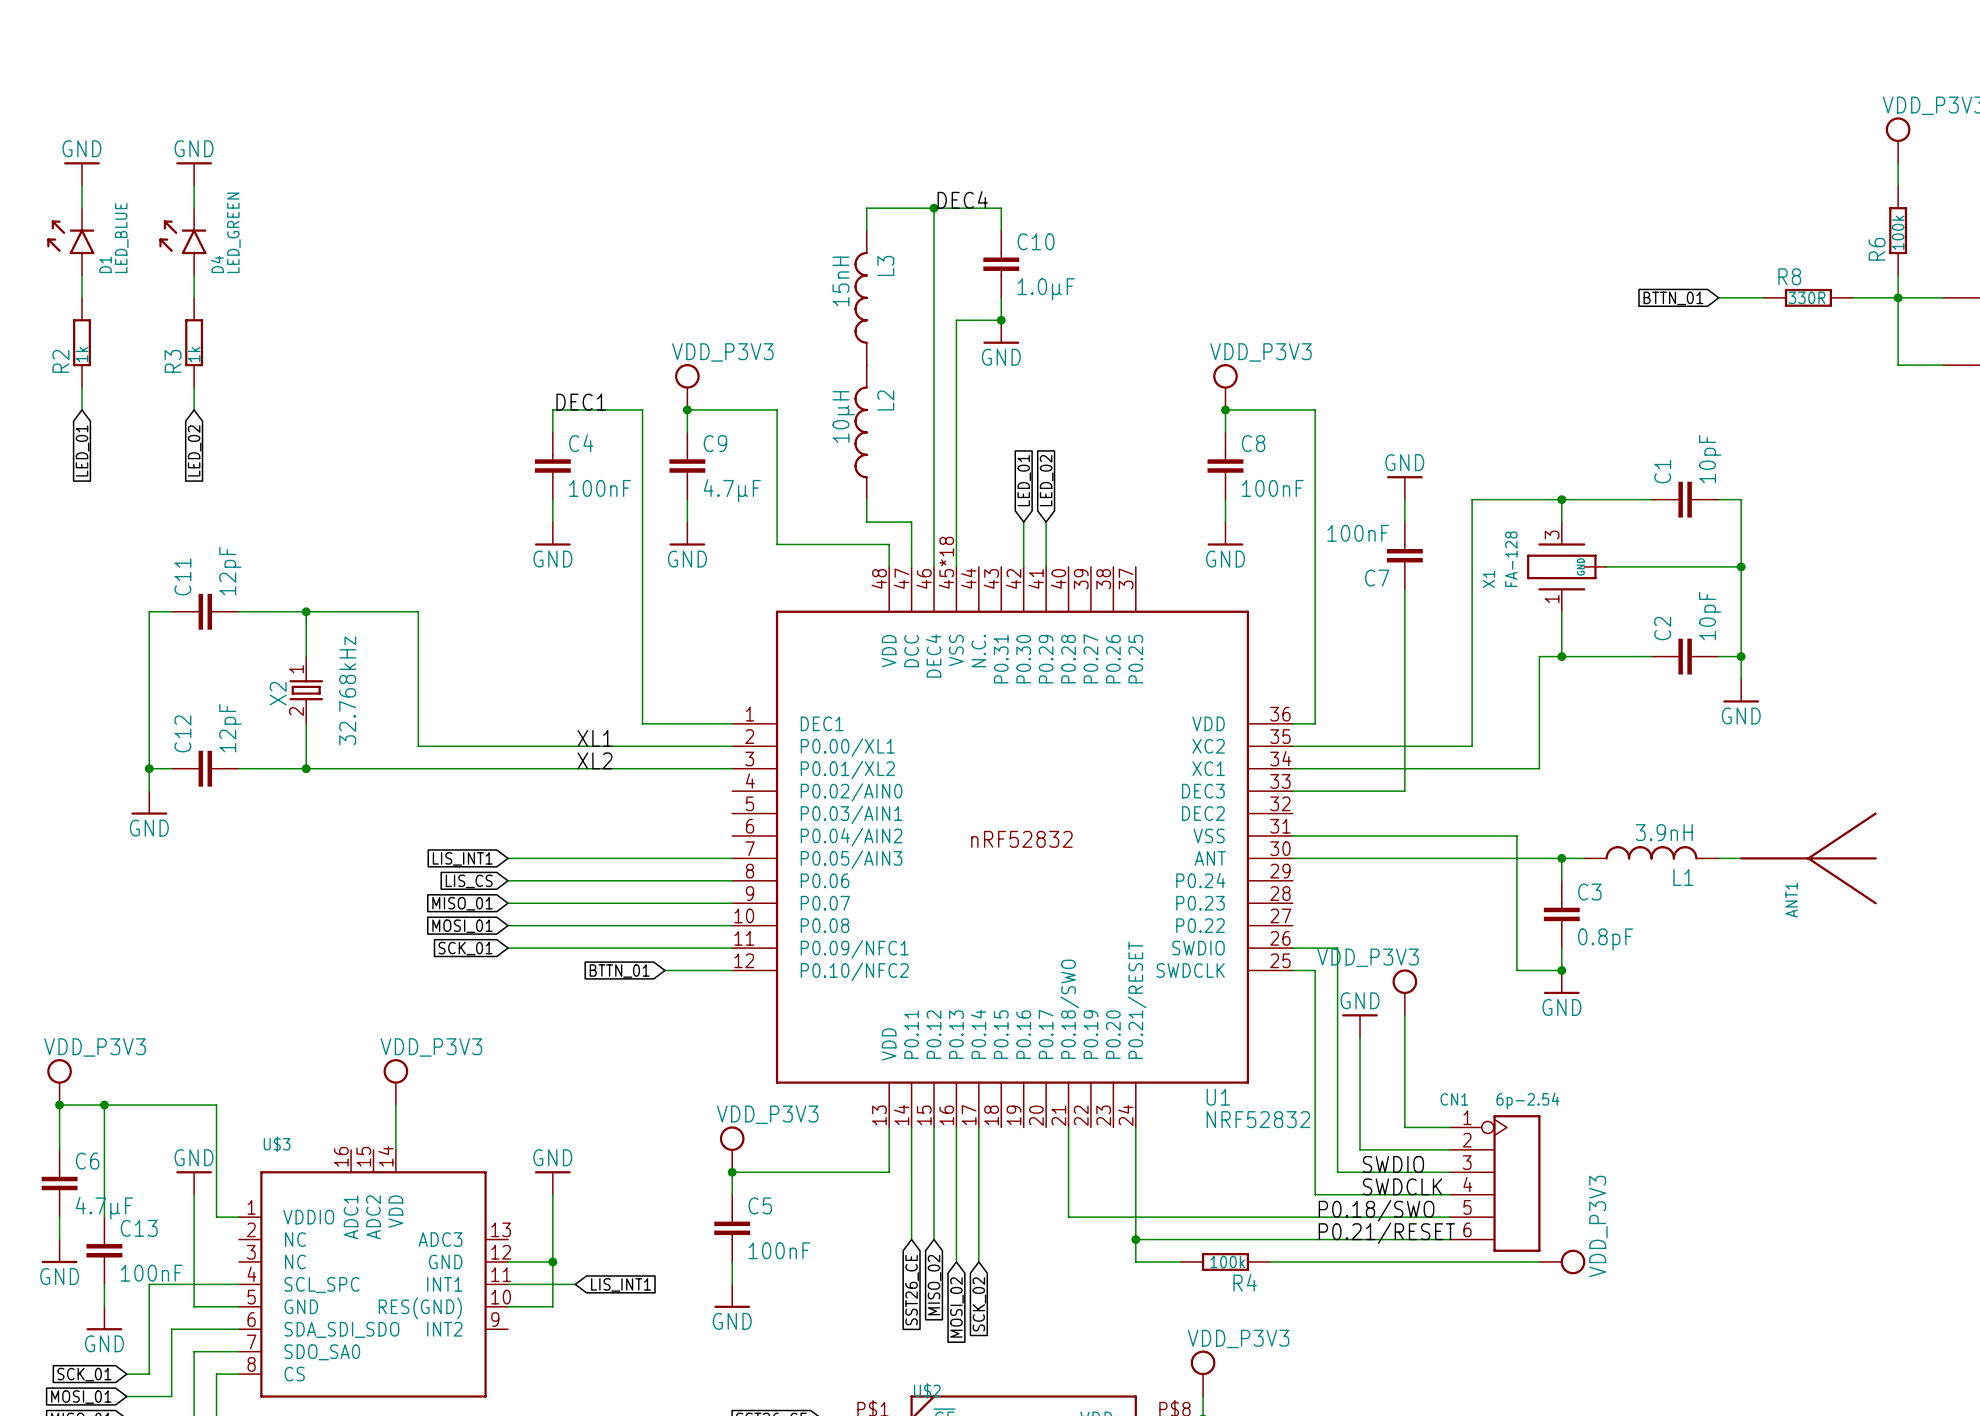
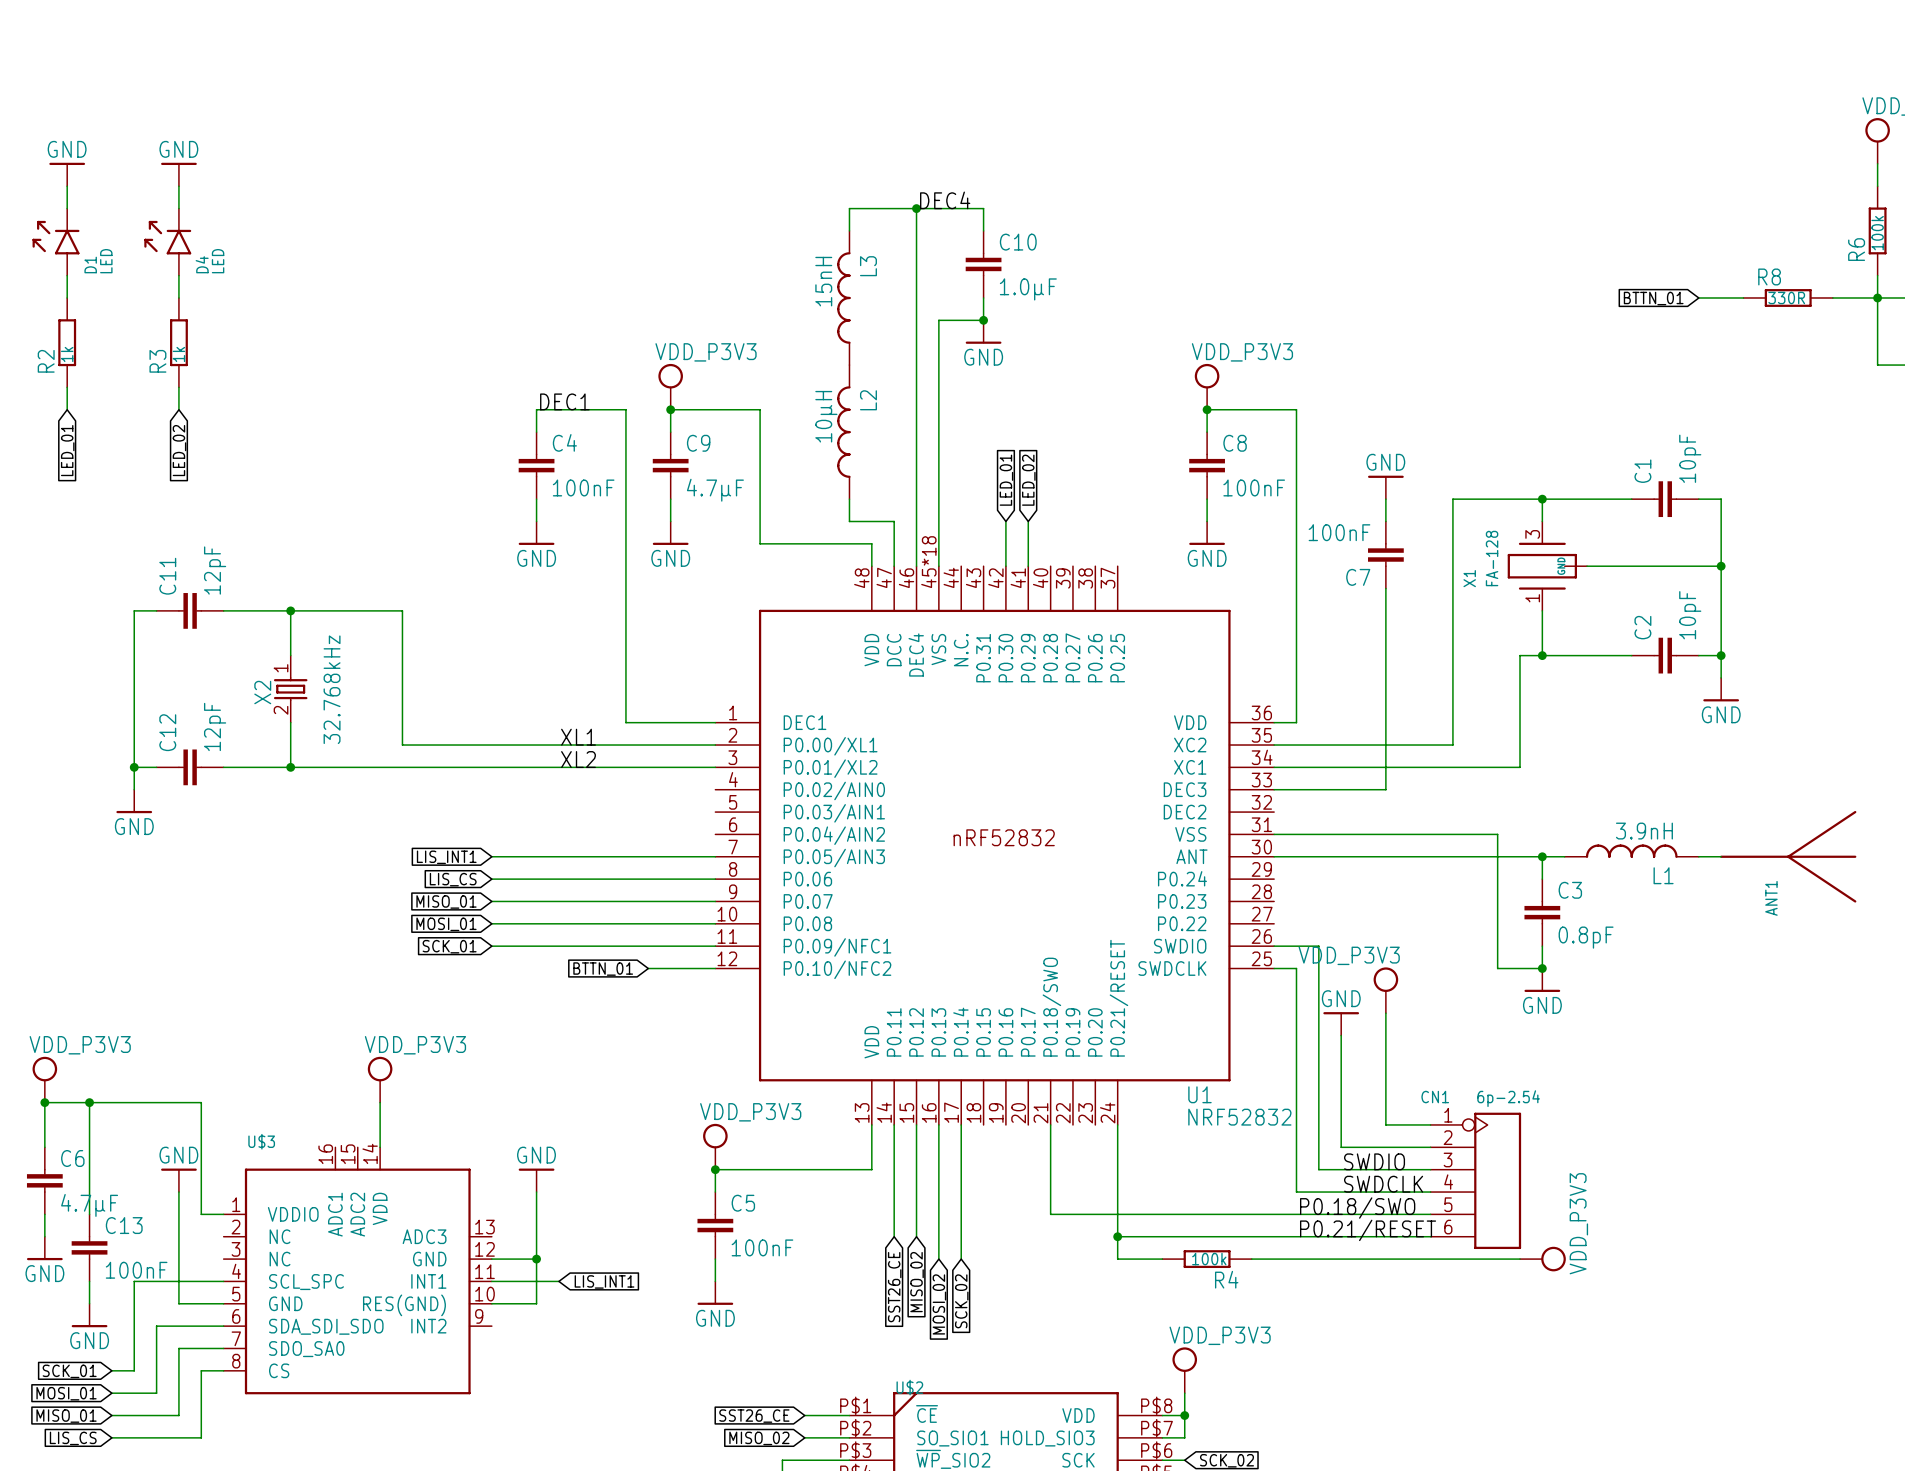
D4 value: LED_GREEN (233, 232) -> LED (218, 261)
D1 value: LED_BLUE (121, 238) -> LED (106, 261)

